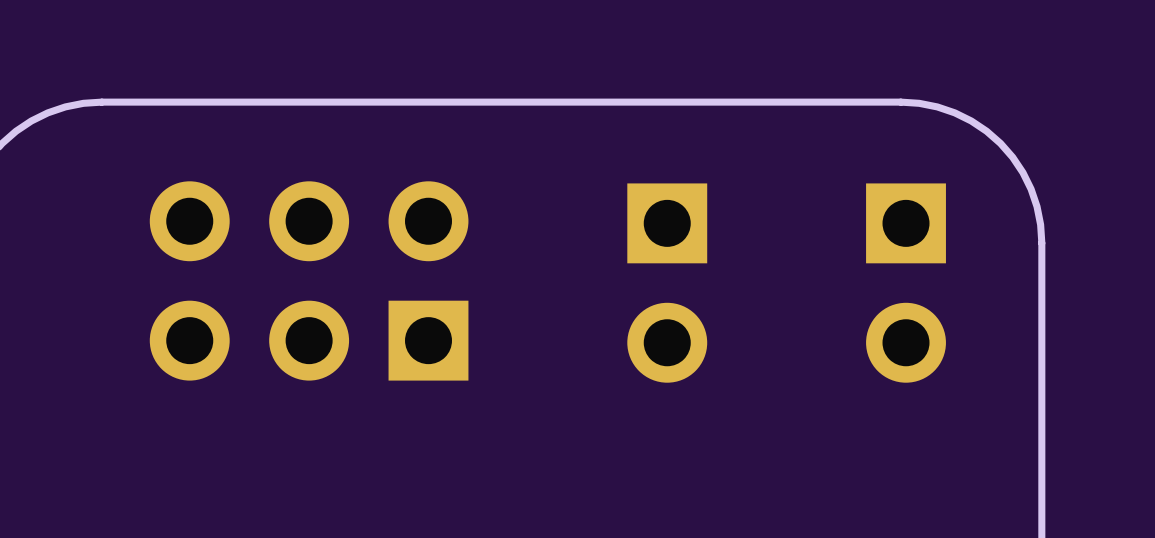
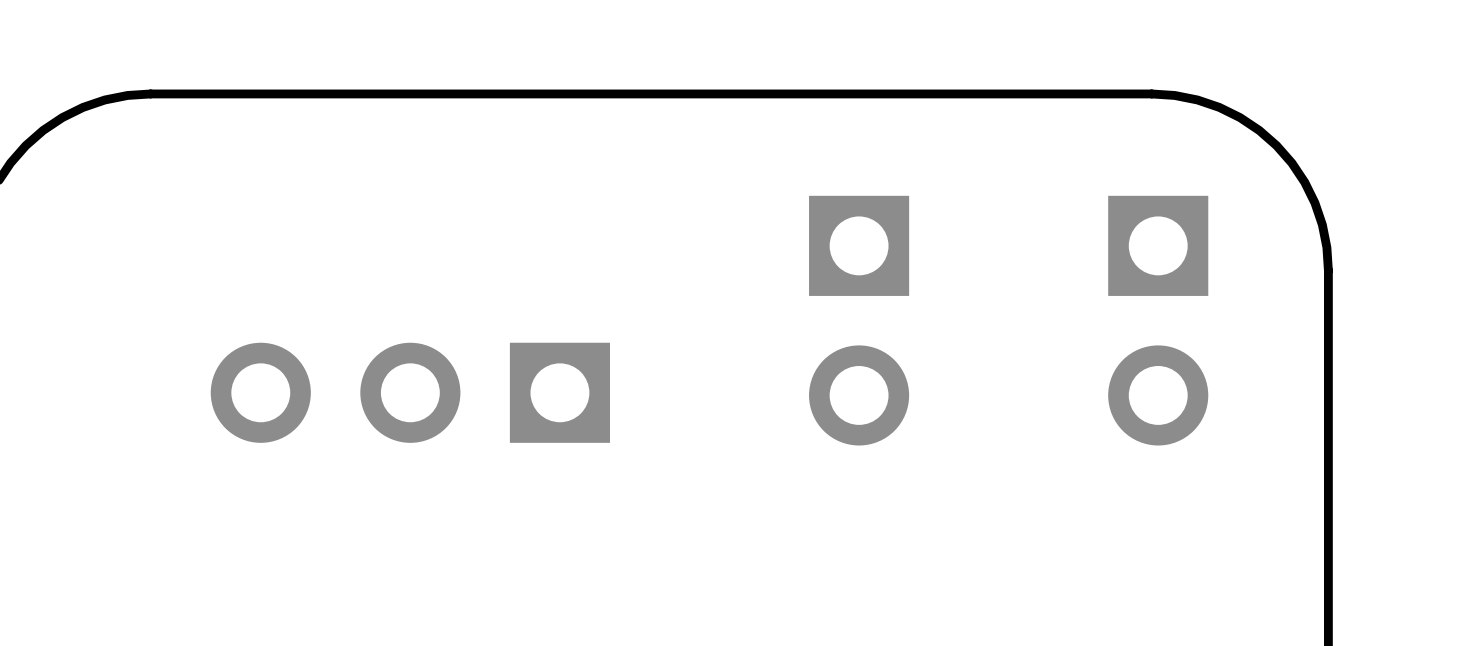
part: (309, 280) -> none

